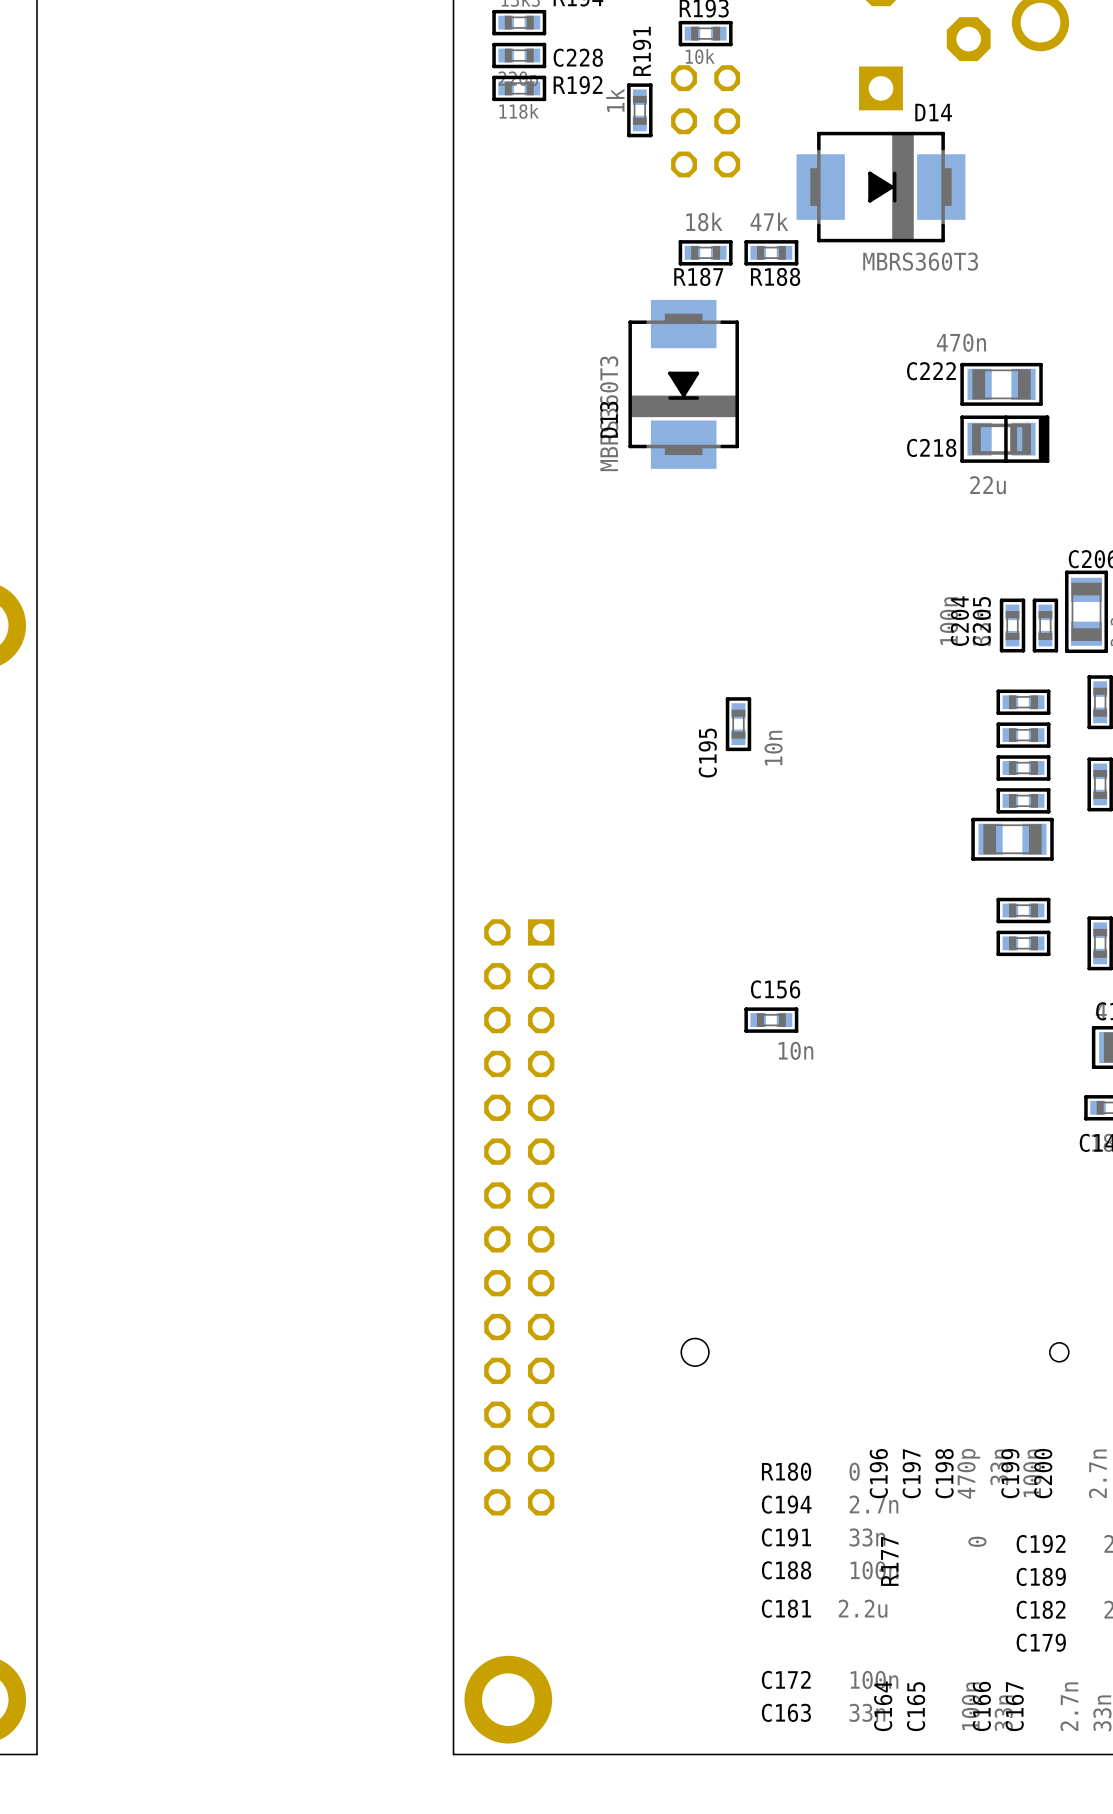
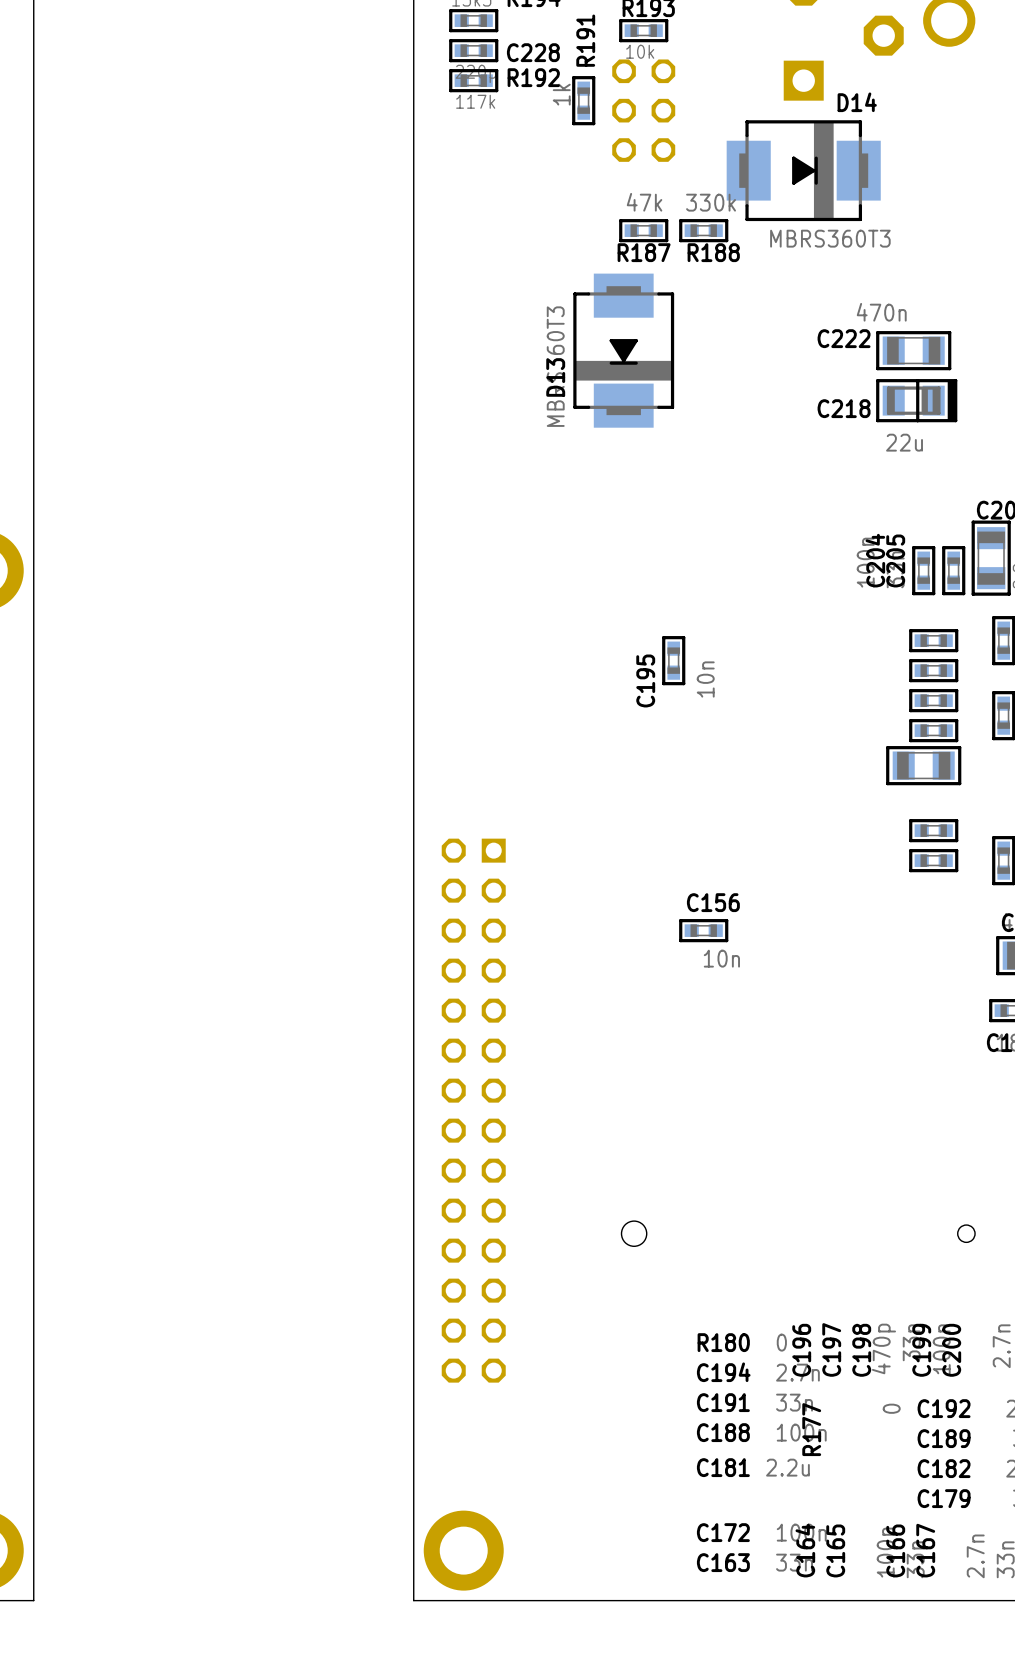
R192 value: 118k (519, 111) -> 117k (475, 101)
R187 value: 18k (704, 221) -> 47k (644, 202)
R188 value: 47k (769, 221) -> 330k (711, 202)

